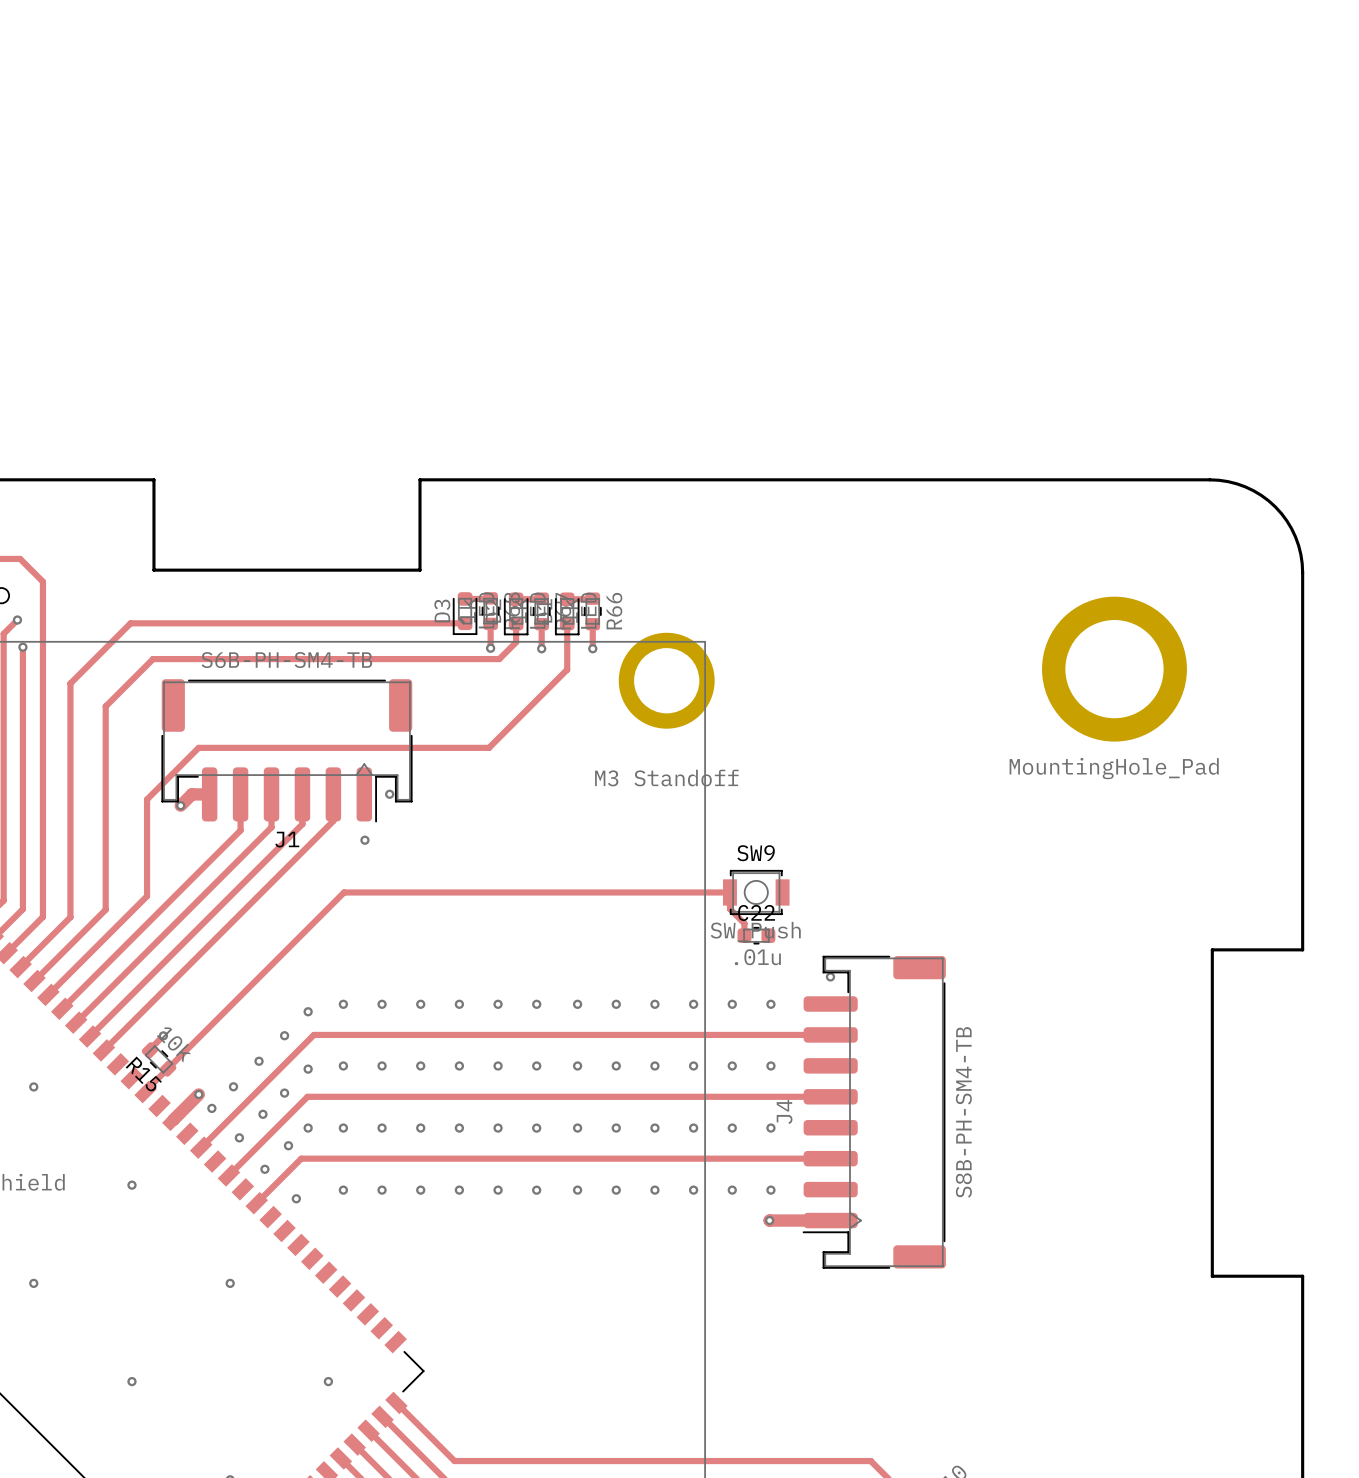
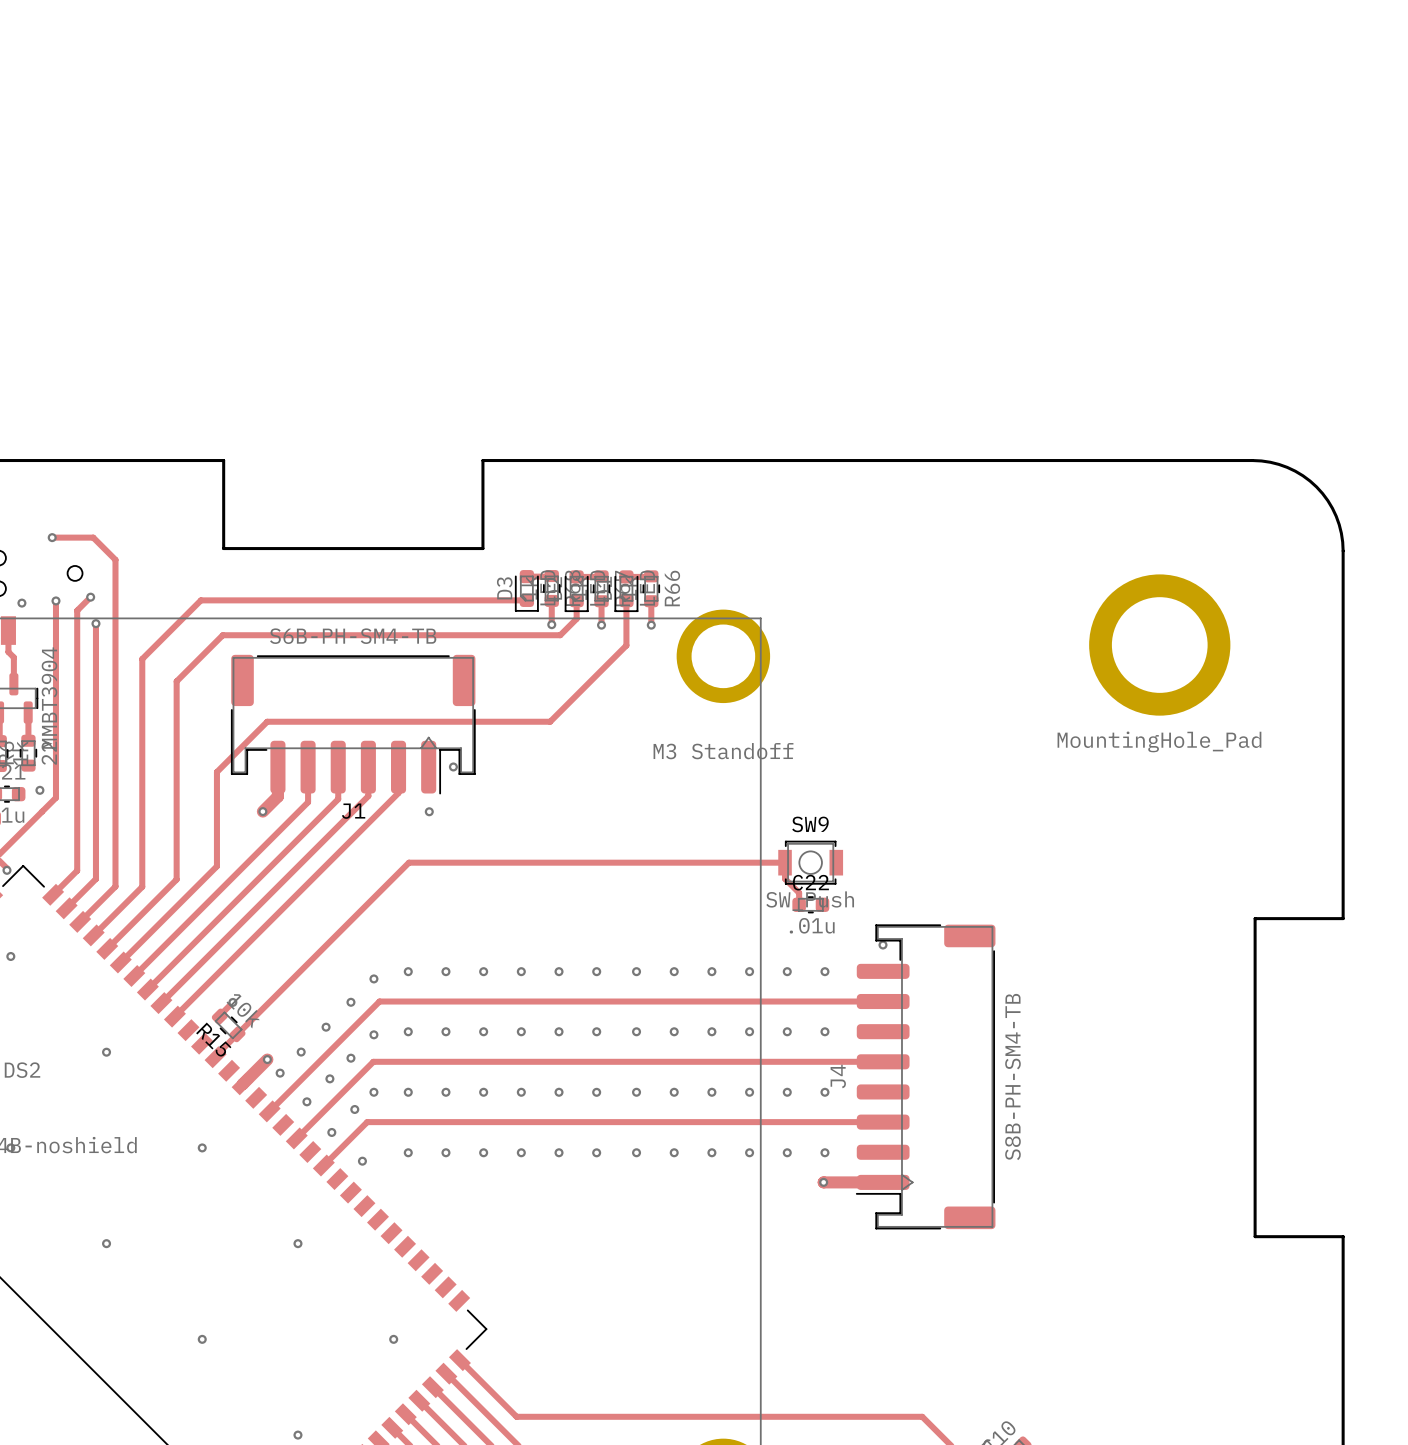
track: (209, 794) (191, 794) (180, 805) -> (277, 767) (277, 796) (262, 811)
via position: (180, 805) -> (262, 811)

